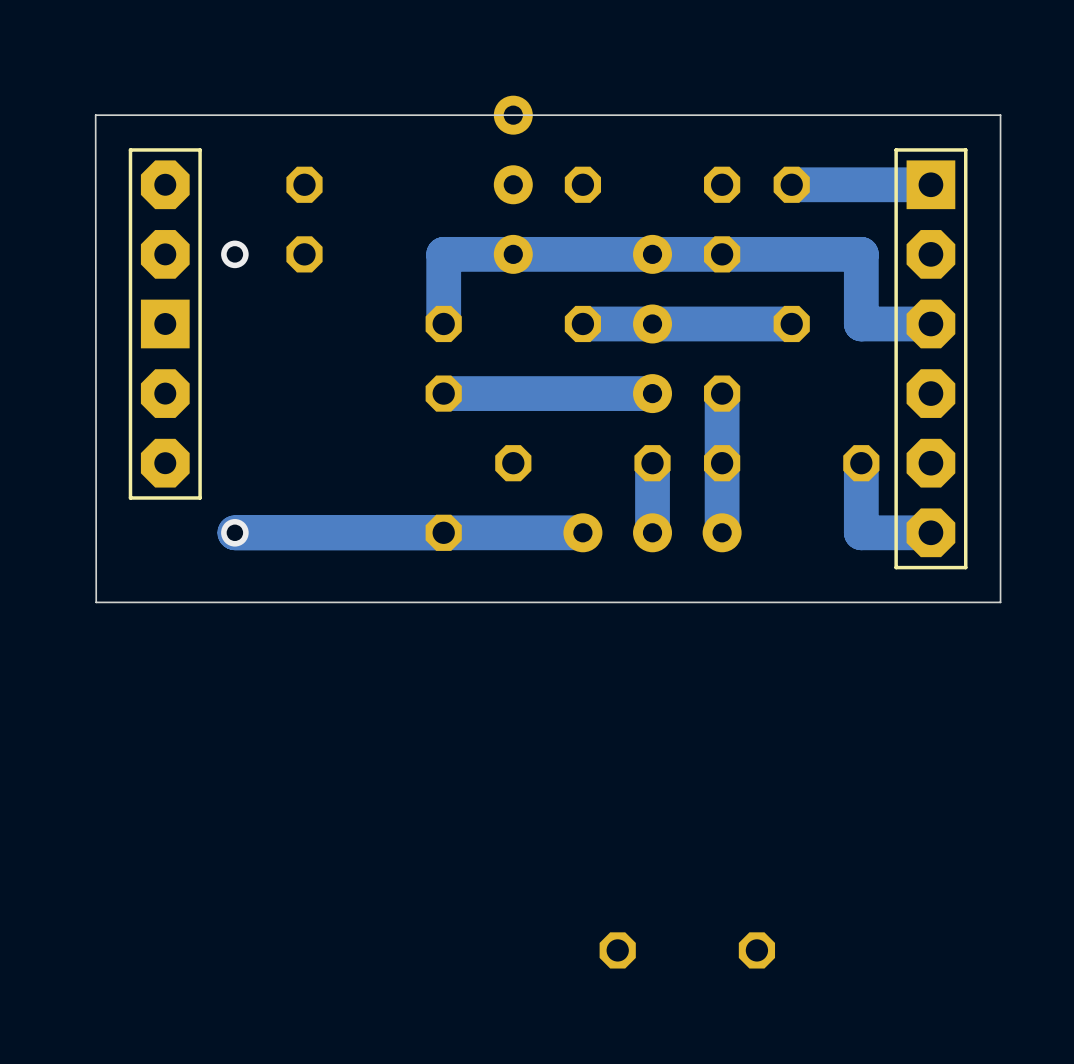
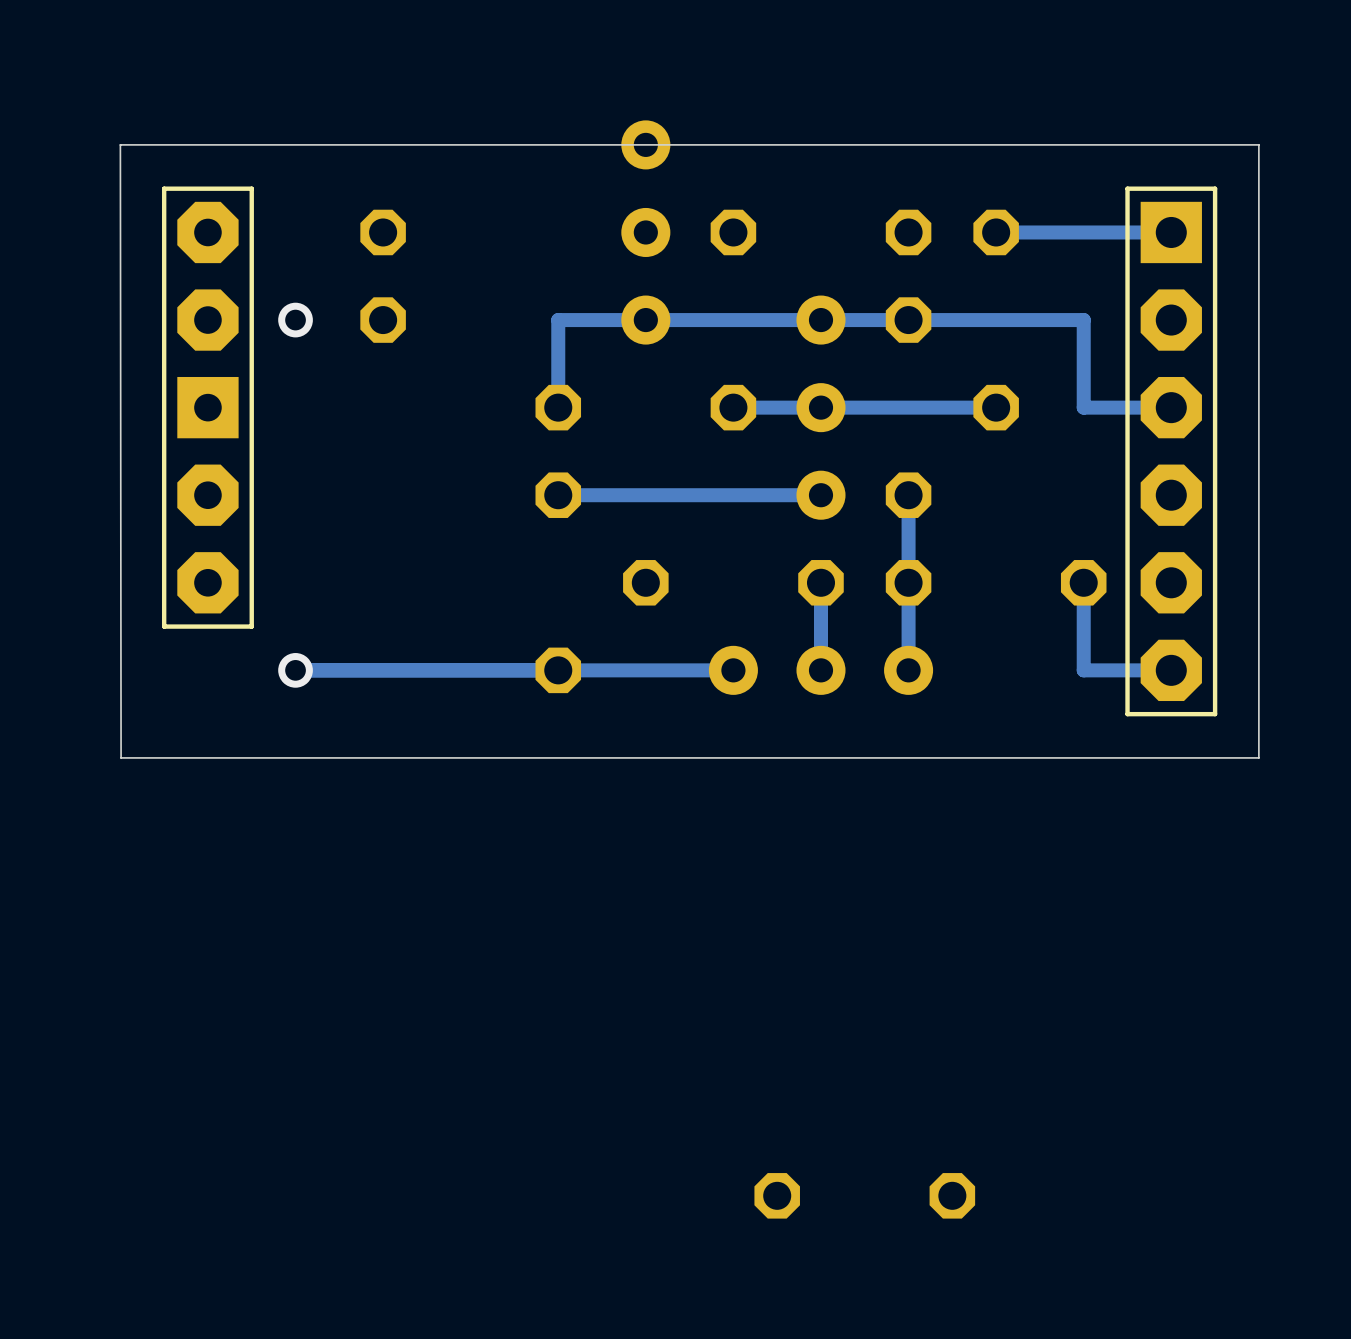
track width: thick (930, 184) (791, 184) -> thin (1171, 232) (996, 232)
track width: thick (791, 323) (582, 323) -> thin (996, 407) (733, 407)
track width: thick (930, 323) (861, 323) (861, 254) (443, 254) (443, 323) -> thin (1171, 407) (1083, 407) (1083, 320) (558, 320) (558, 407)
track width: thick (652, 393) (443, 393) -> thin (820, 495) (558, 495)
track width: thick (722, 393) (722, 532) -> thin (908, 495) (908, 670)
track width: thick (652, 463) (652, 532) -> thin (820, 582) (820, 670)
track width: thick (861, 463) (861, 532) (930, 532) -> thin (1083, 582) (1083, 670) (1171, 670)
track width: thick (582, 532) (234, 532) -> thin (733, 670) (295, 670)

